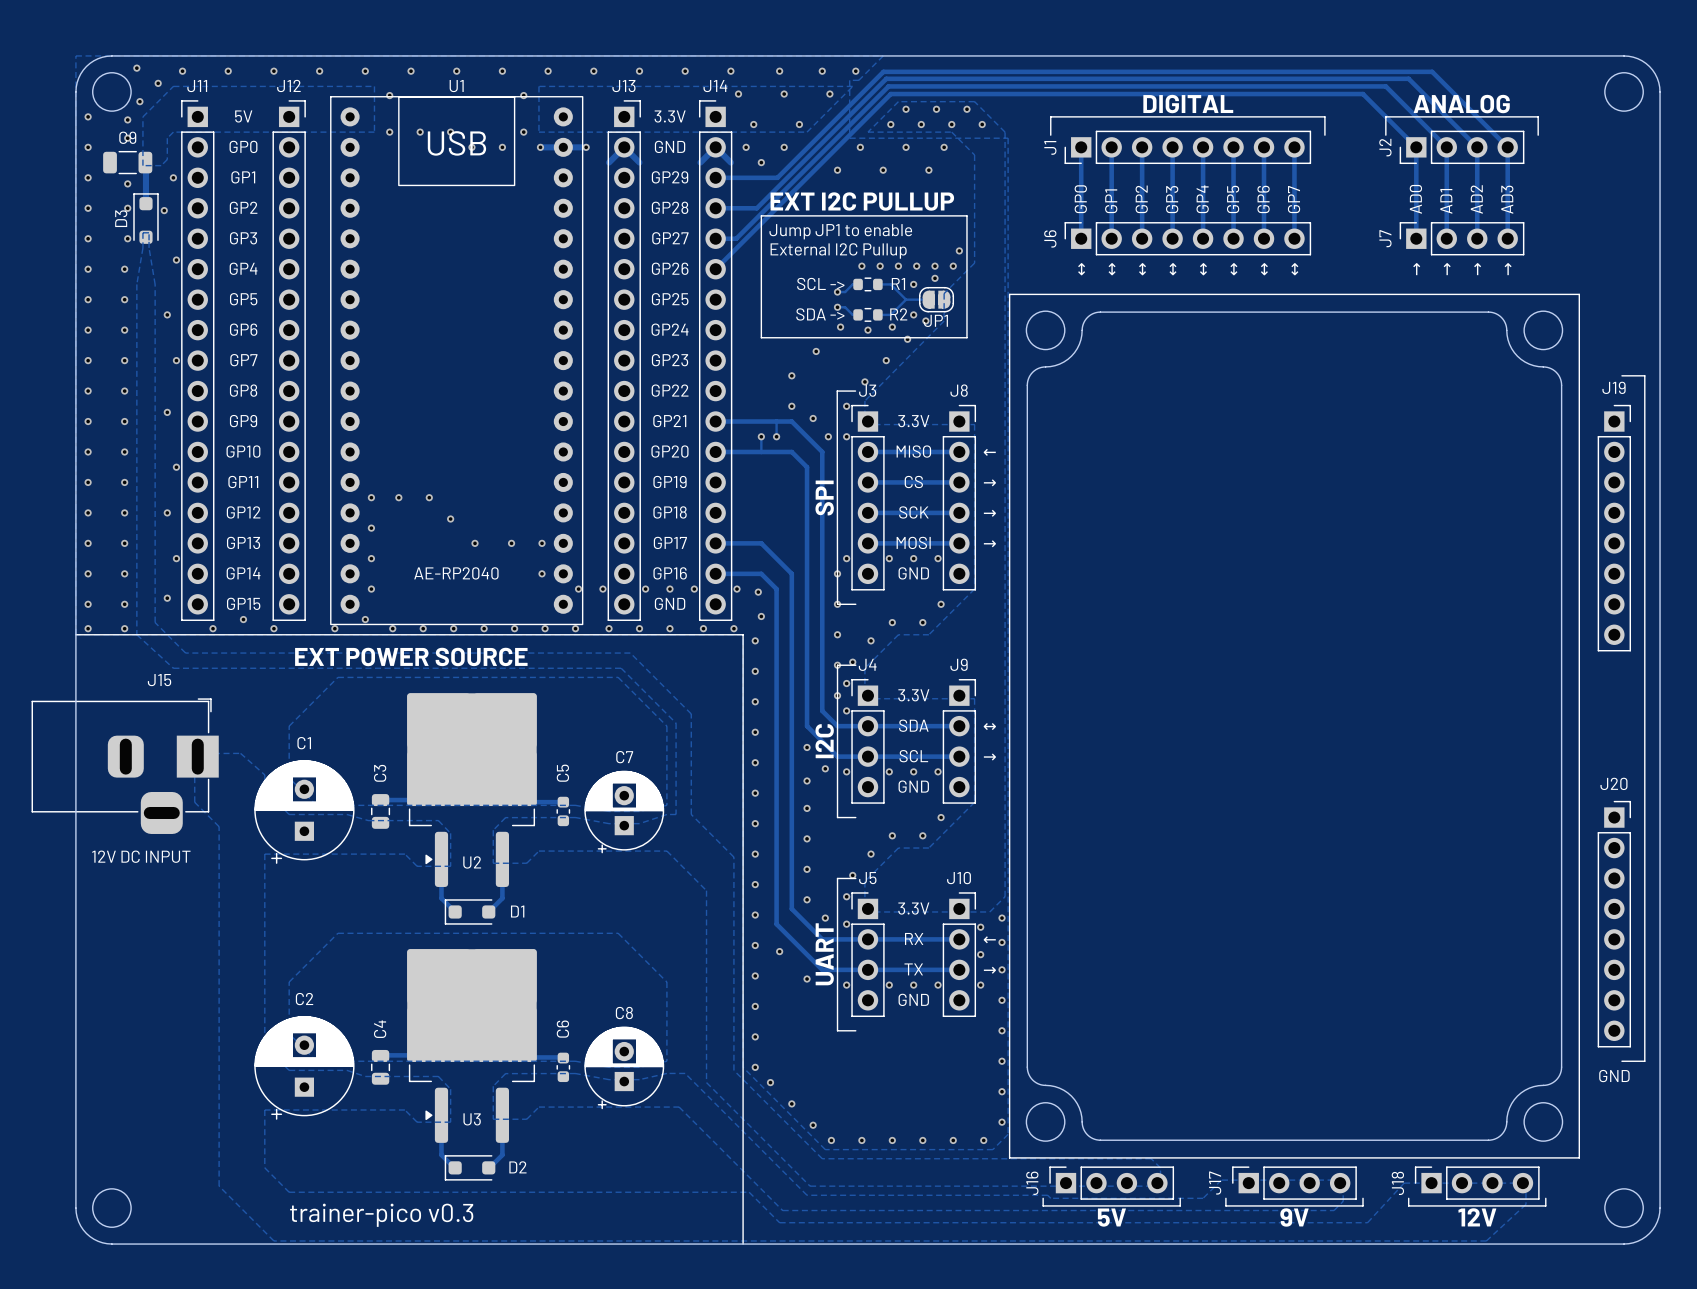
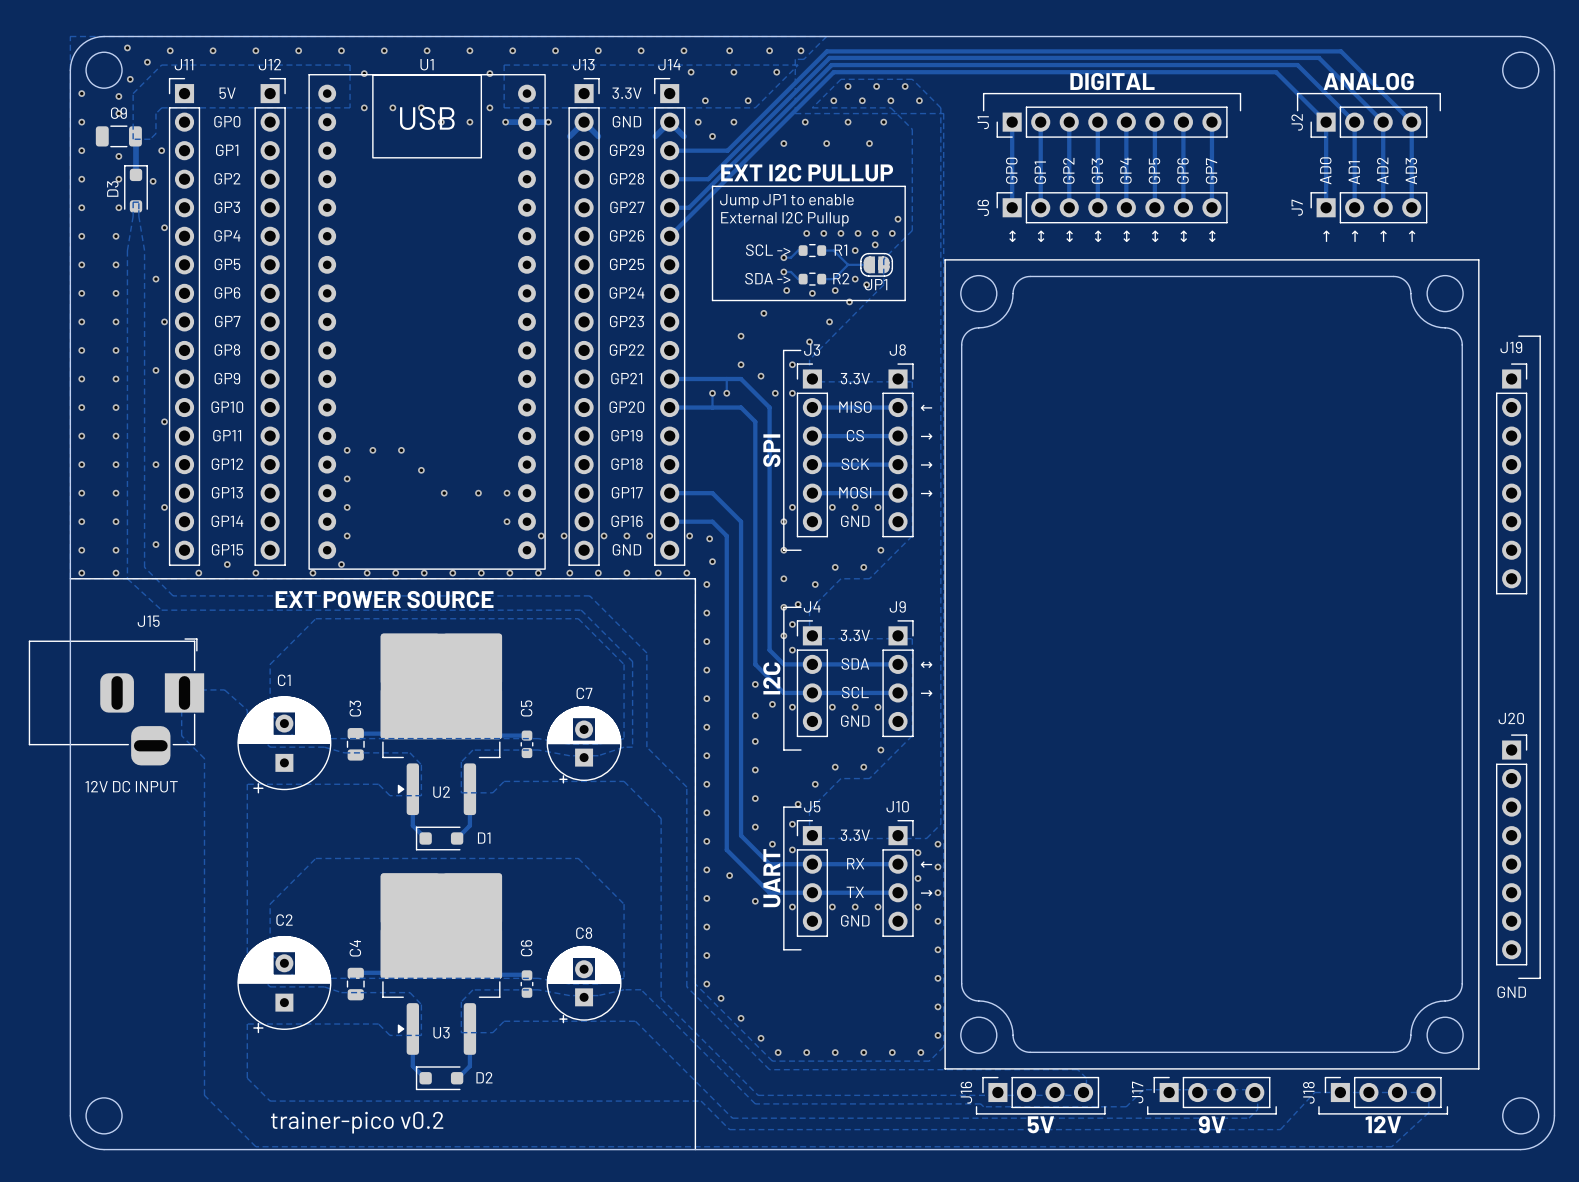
text: AE-RP2040 (456, 573) -> none
text: trainer-pico v0.3 (381, 1215) -> trainer-pico v0.2 (357, 1122)

